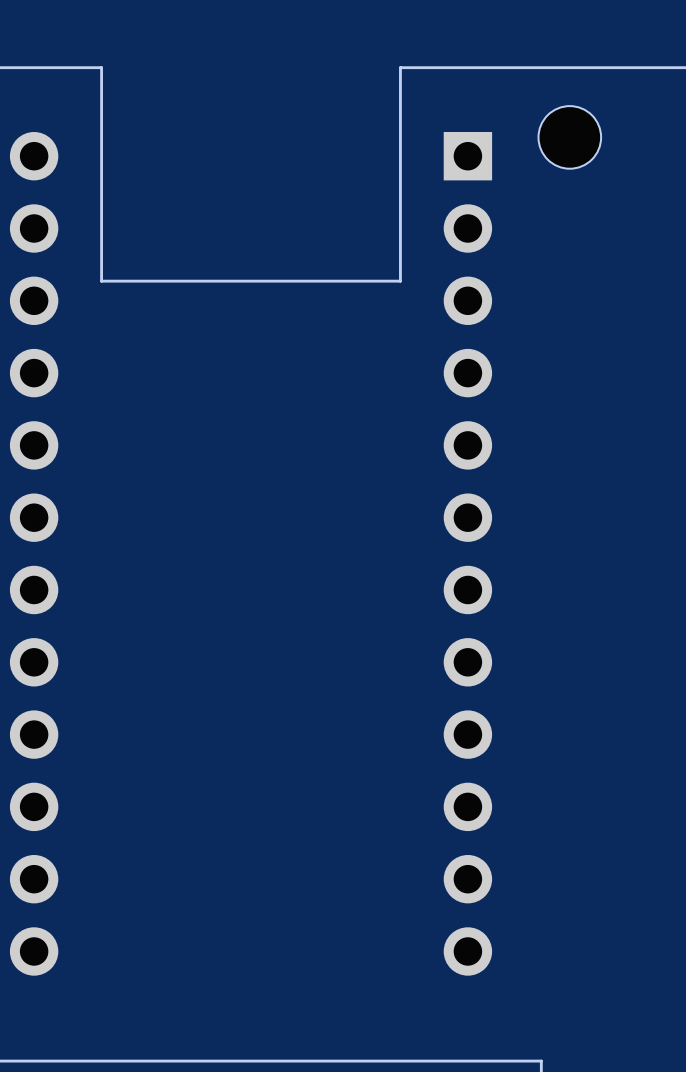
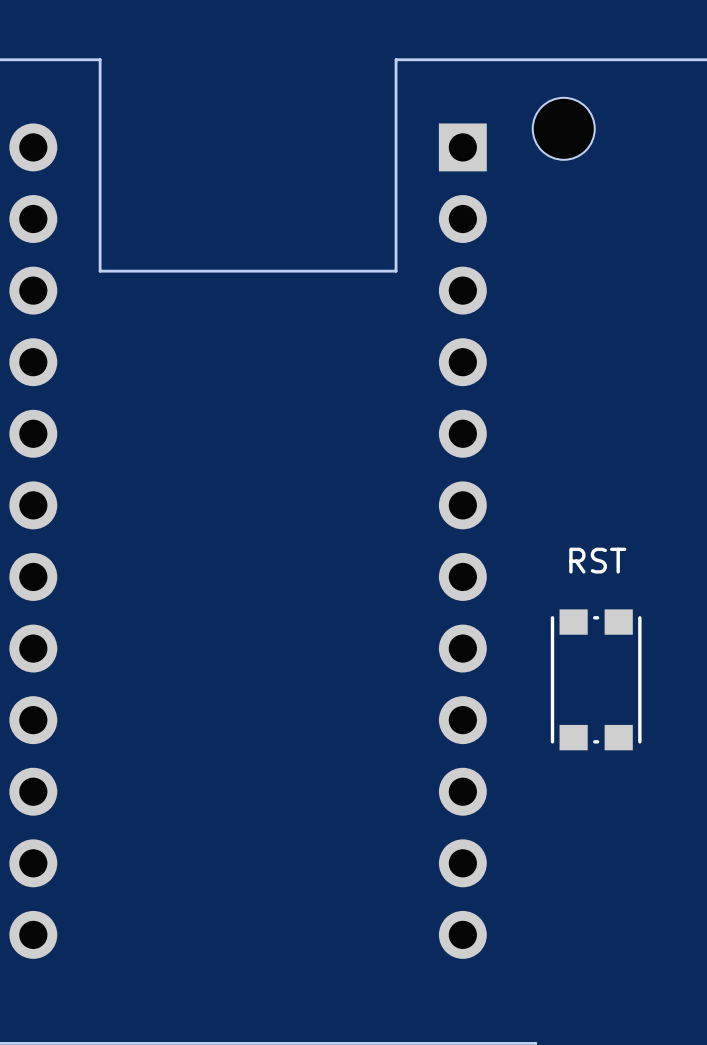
text: none -> RST (597, 560)
part: none -> (596, 679)

